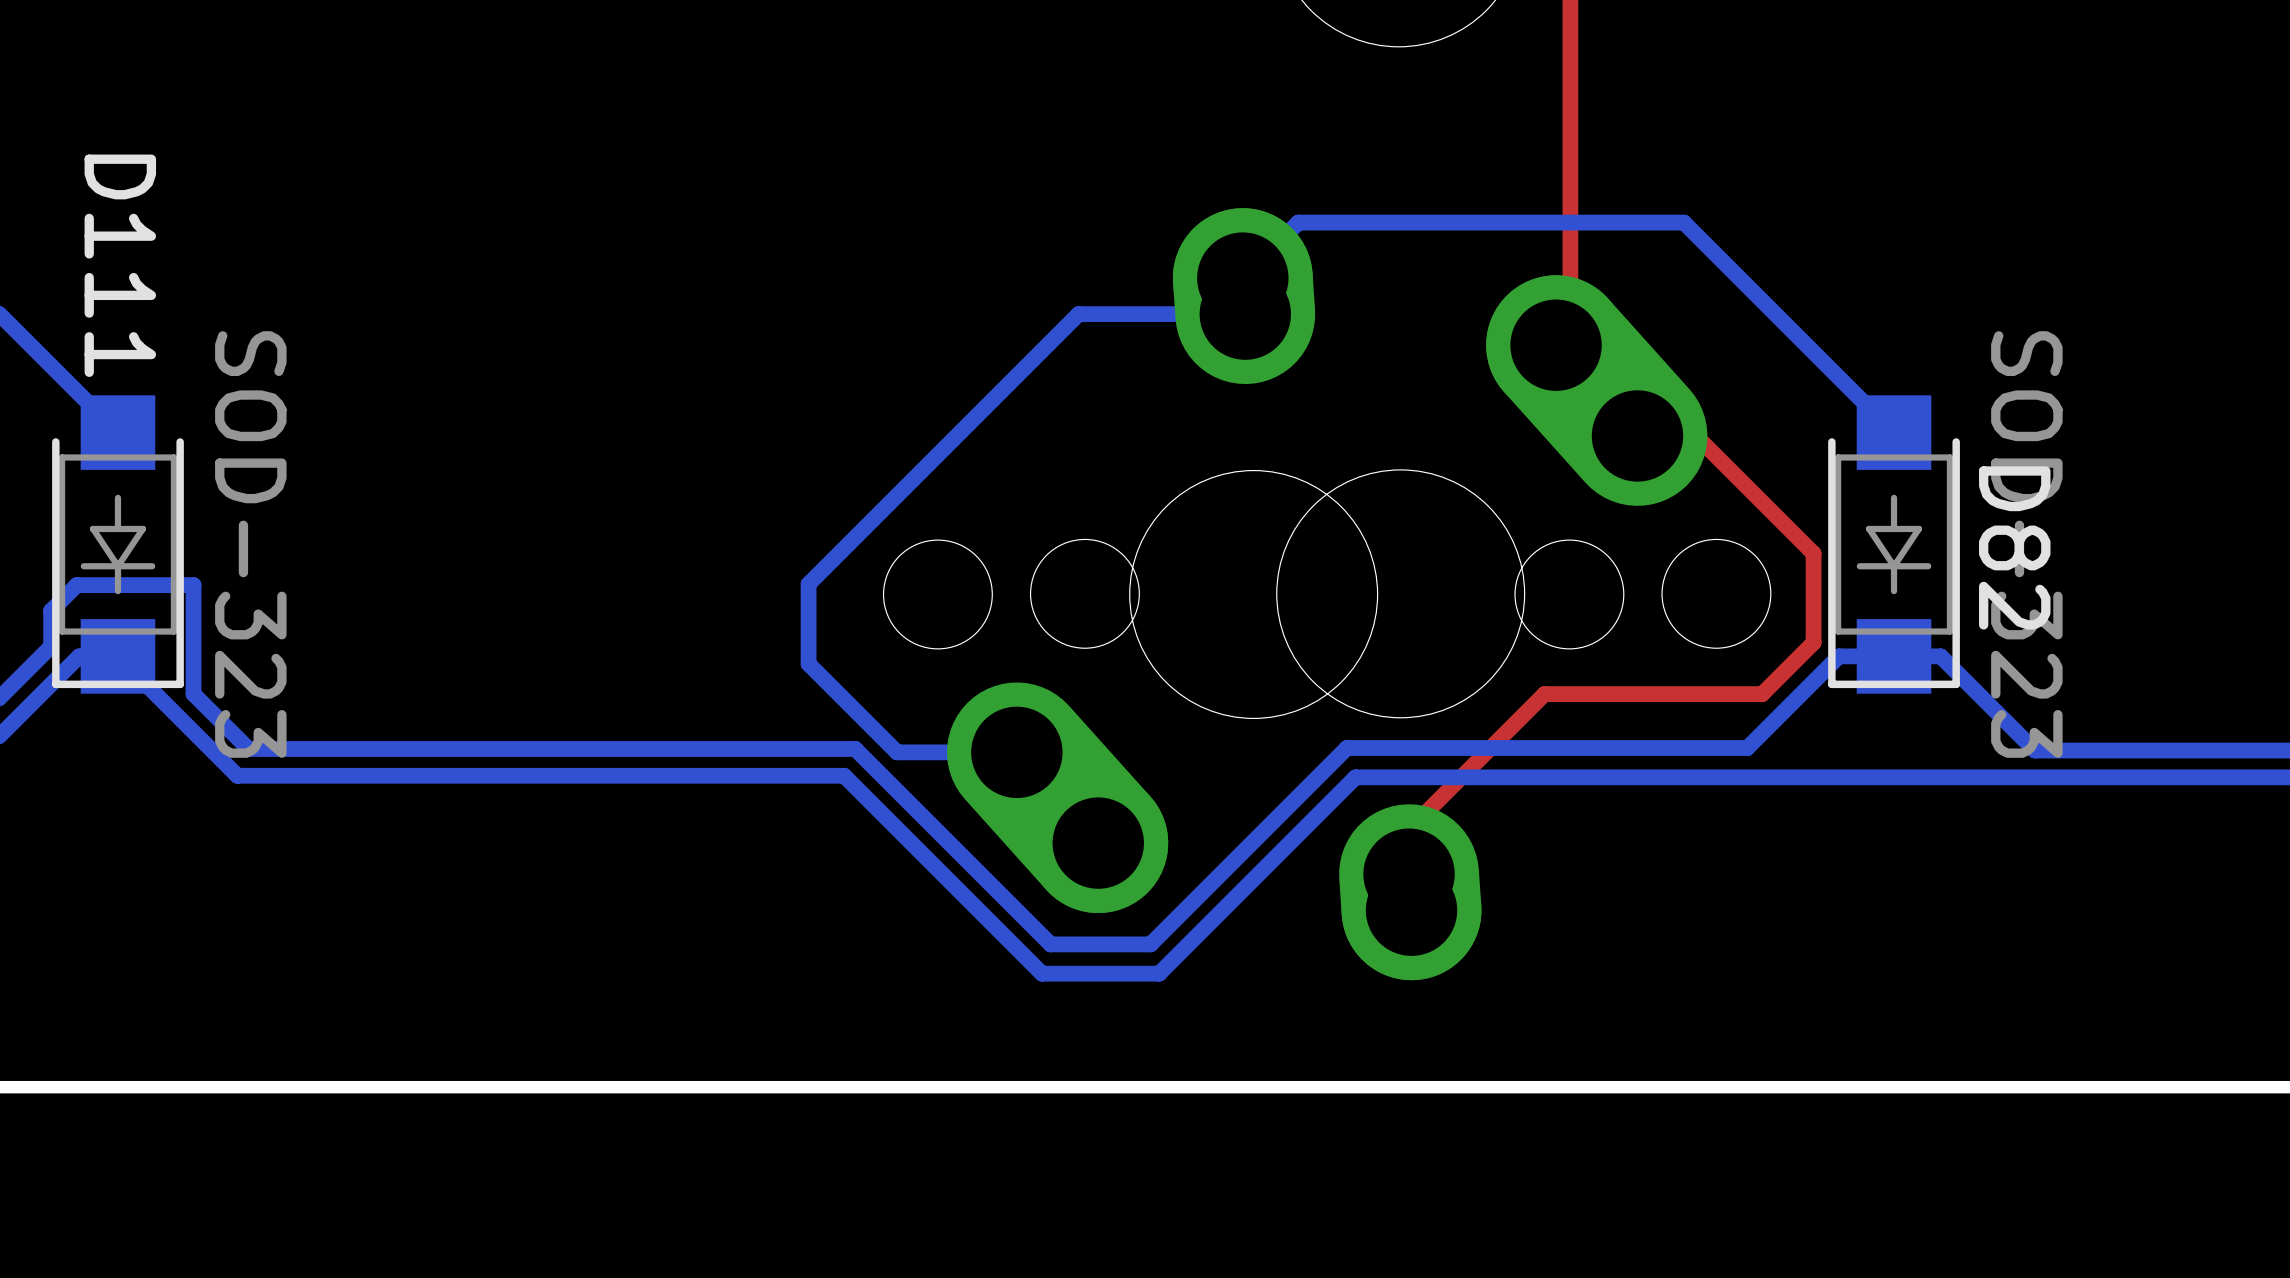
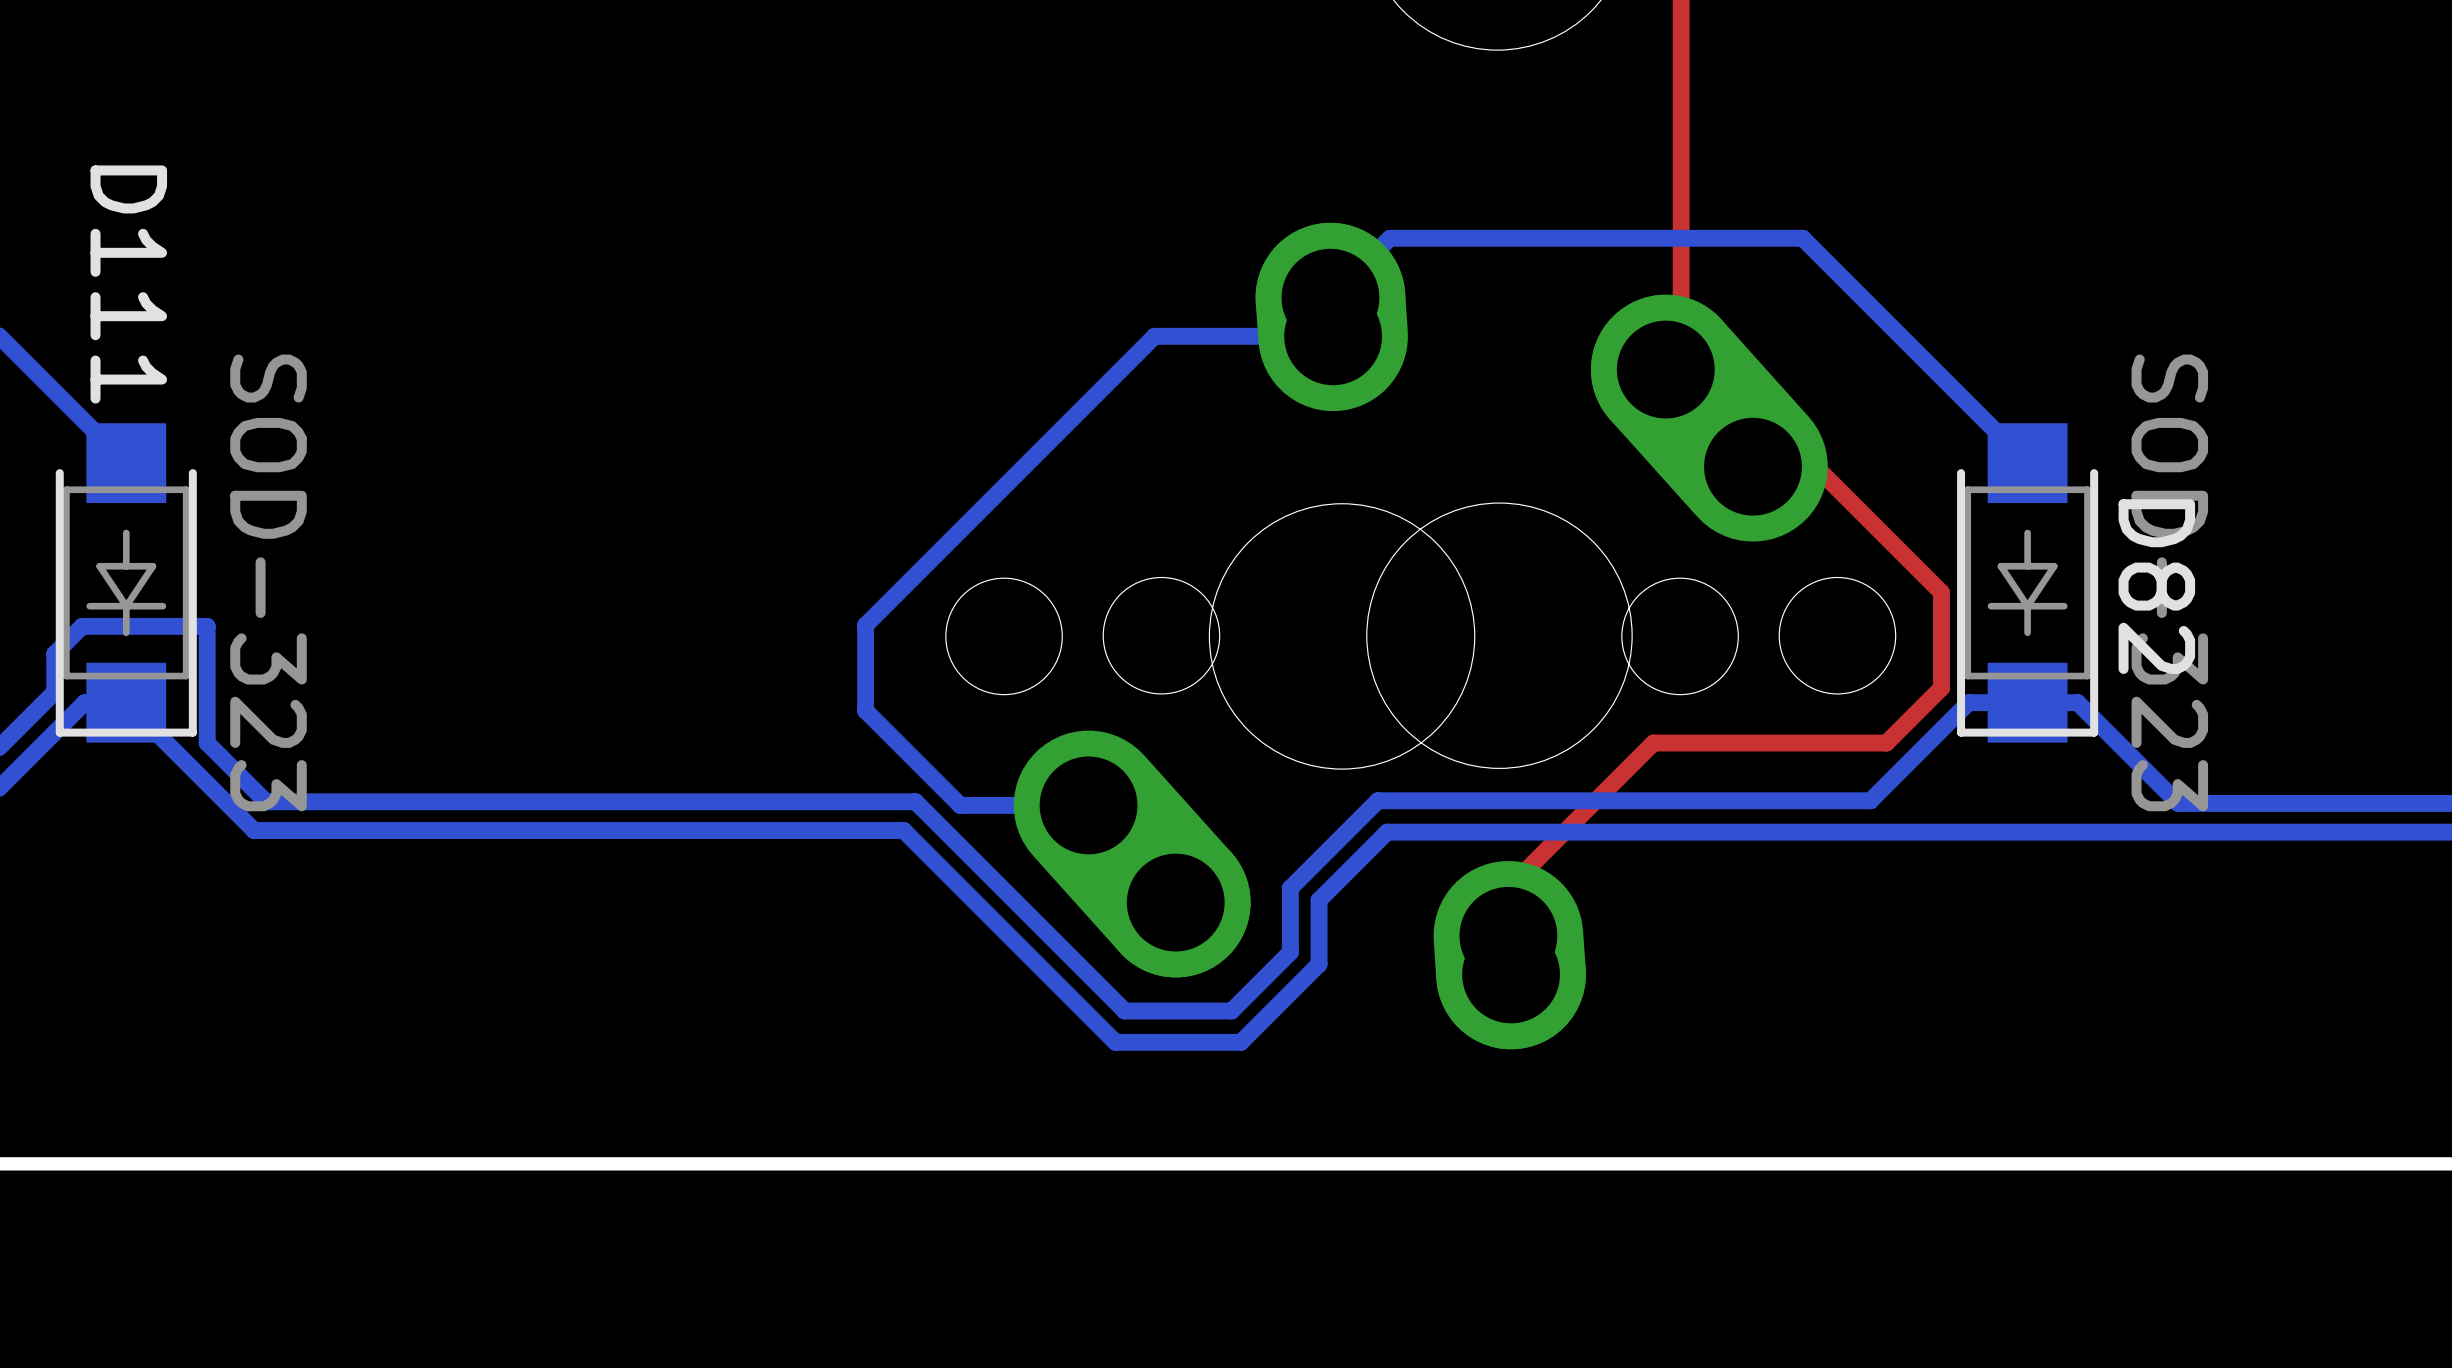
bottom track: (1346, 748) (1205, 889) -> (1441, 800) (1377, 800) (1290, 888) (1290, 952)
bottom track: (1355, 777) (1232, 900) -> (1451, 832) (1387, 832) (1319, 900) (1319, 964)

